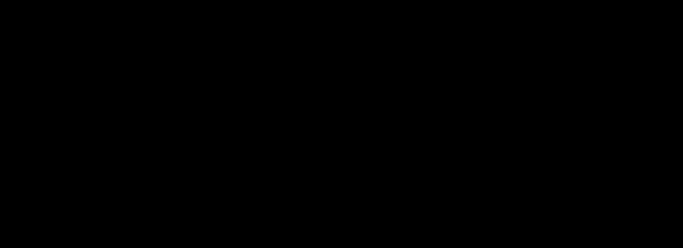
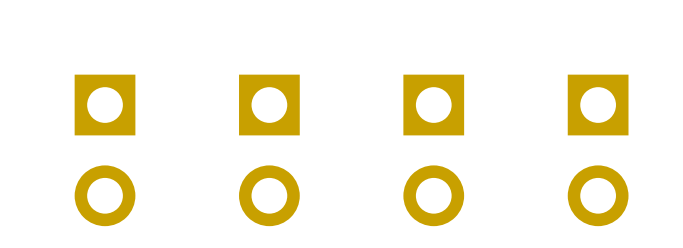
part: none -> (105, 150)
part: none -> (269, 150)
part: none -> (433, 150)
part: none -> (598, 150)

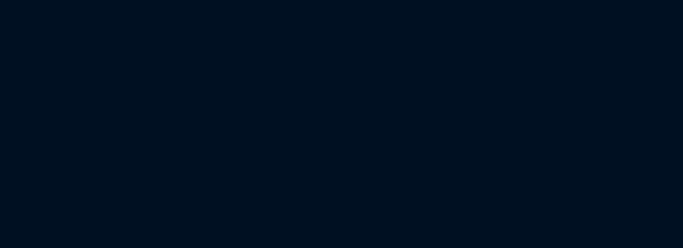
part: (105, 150) -> none
part: (269, 150) -> none
part: (433, 150) -> none
part: (598, 150) -> none

